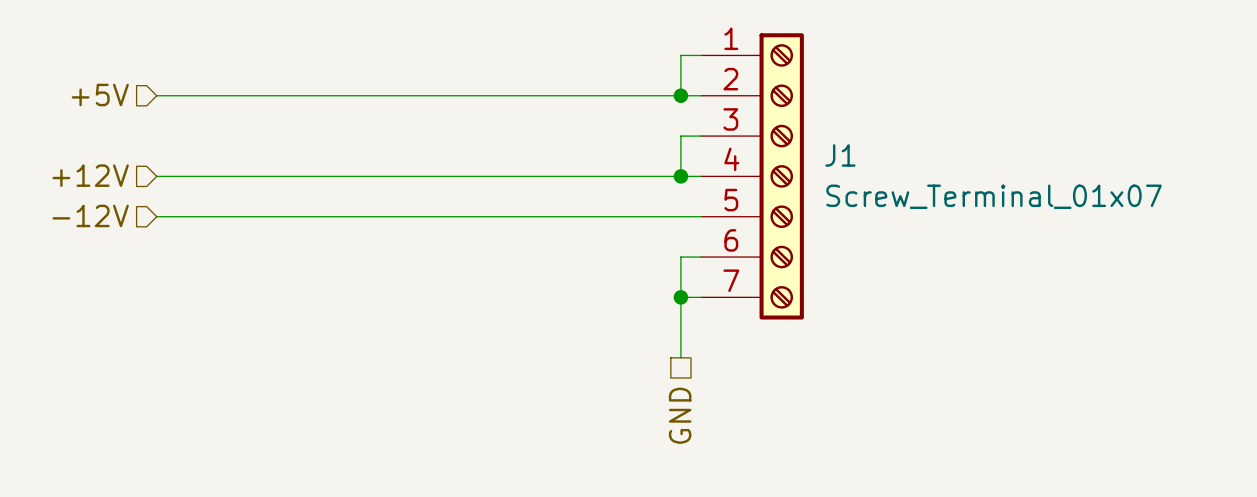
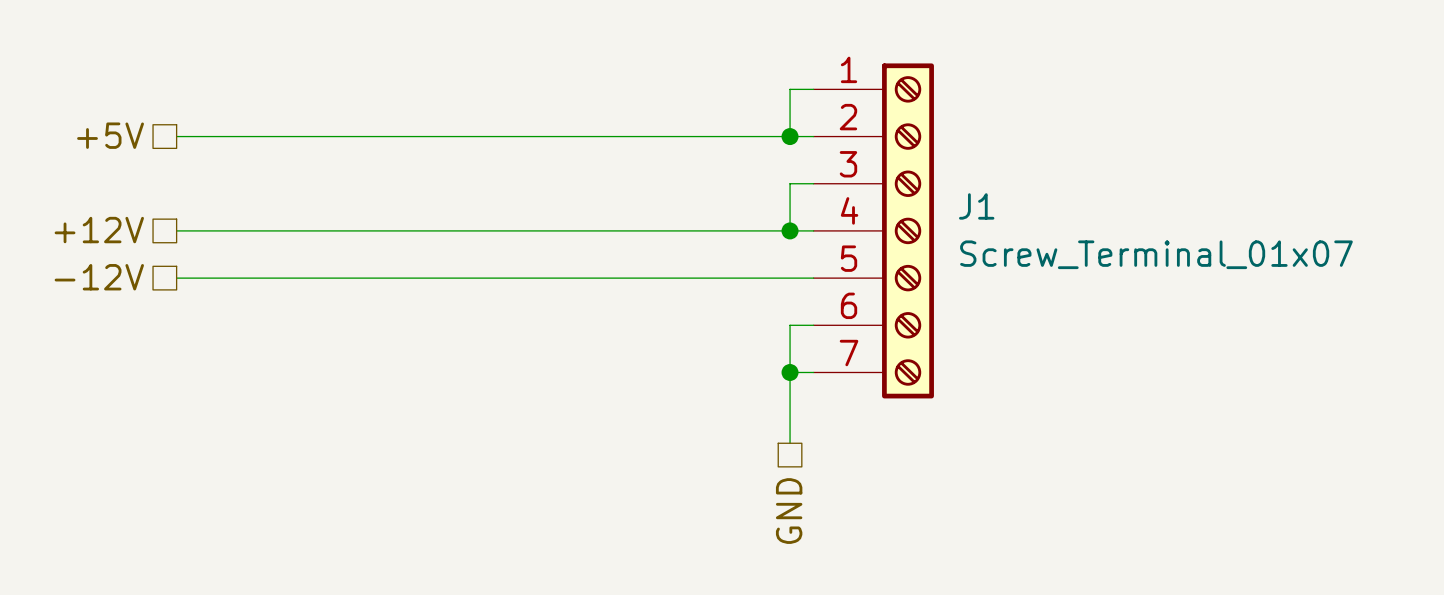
hierarchical label shape: input (100, 95) -> passive (110, 135)
hierarchical label shape: input (90, 175) -> passive (99, 230)
hierarchical label shape: input (90, 215) -> passive (99, 277)

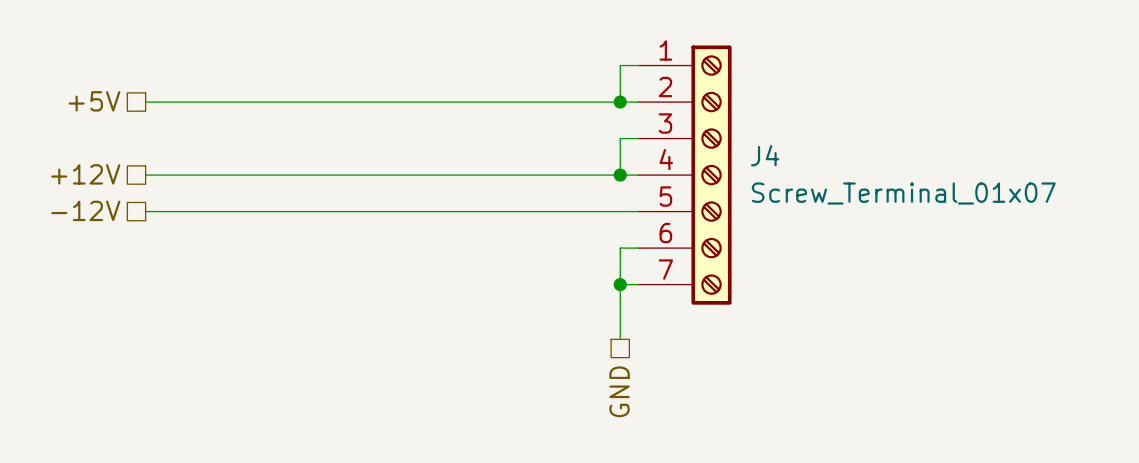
J1 name: J1 (976, 206) -> J4 (765, 155)

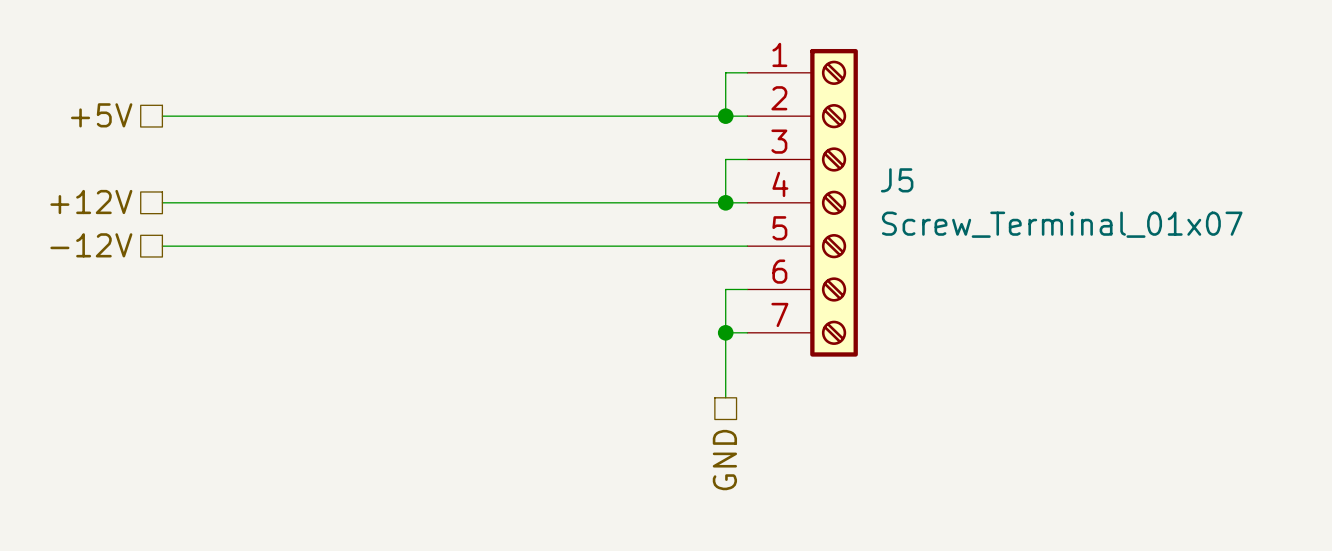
J4 name: J4 (765, 155) -> J5 (897, 180)

